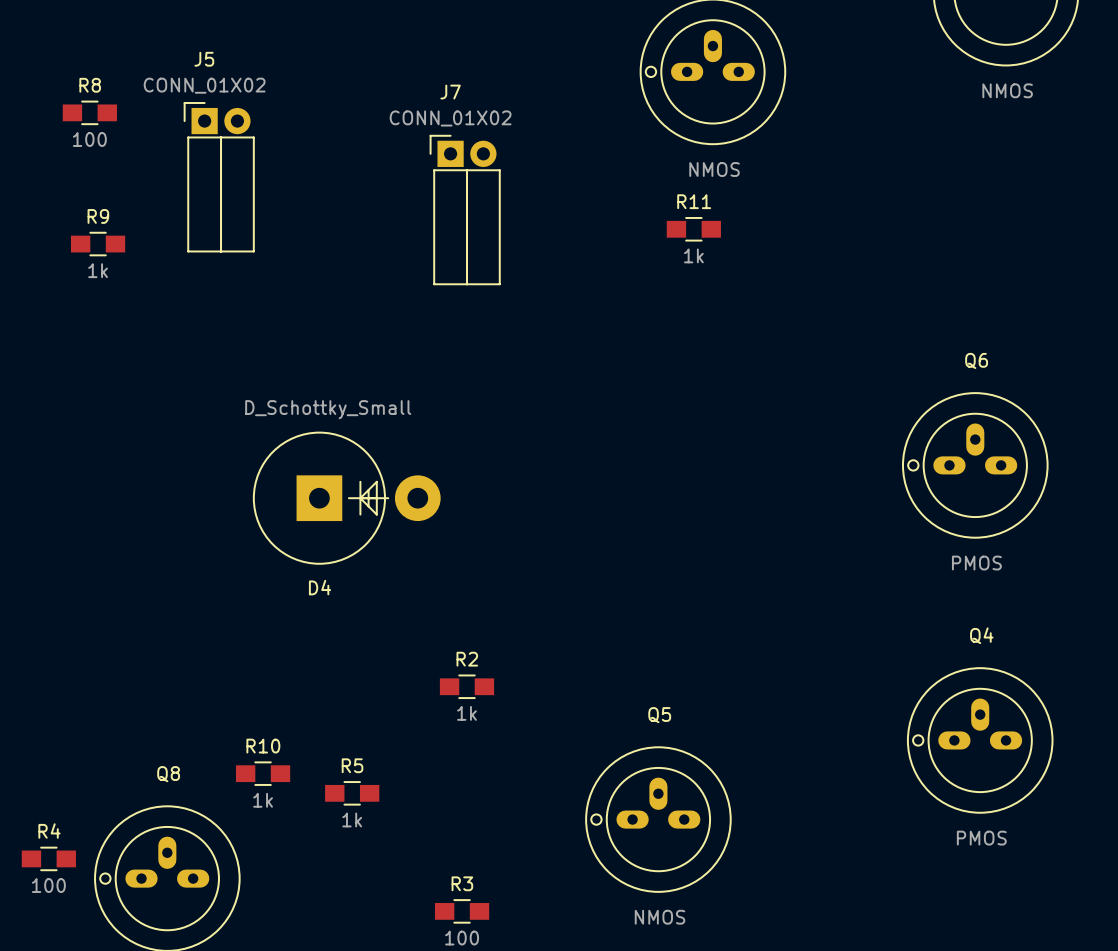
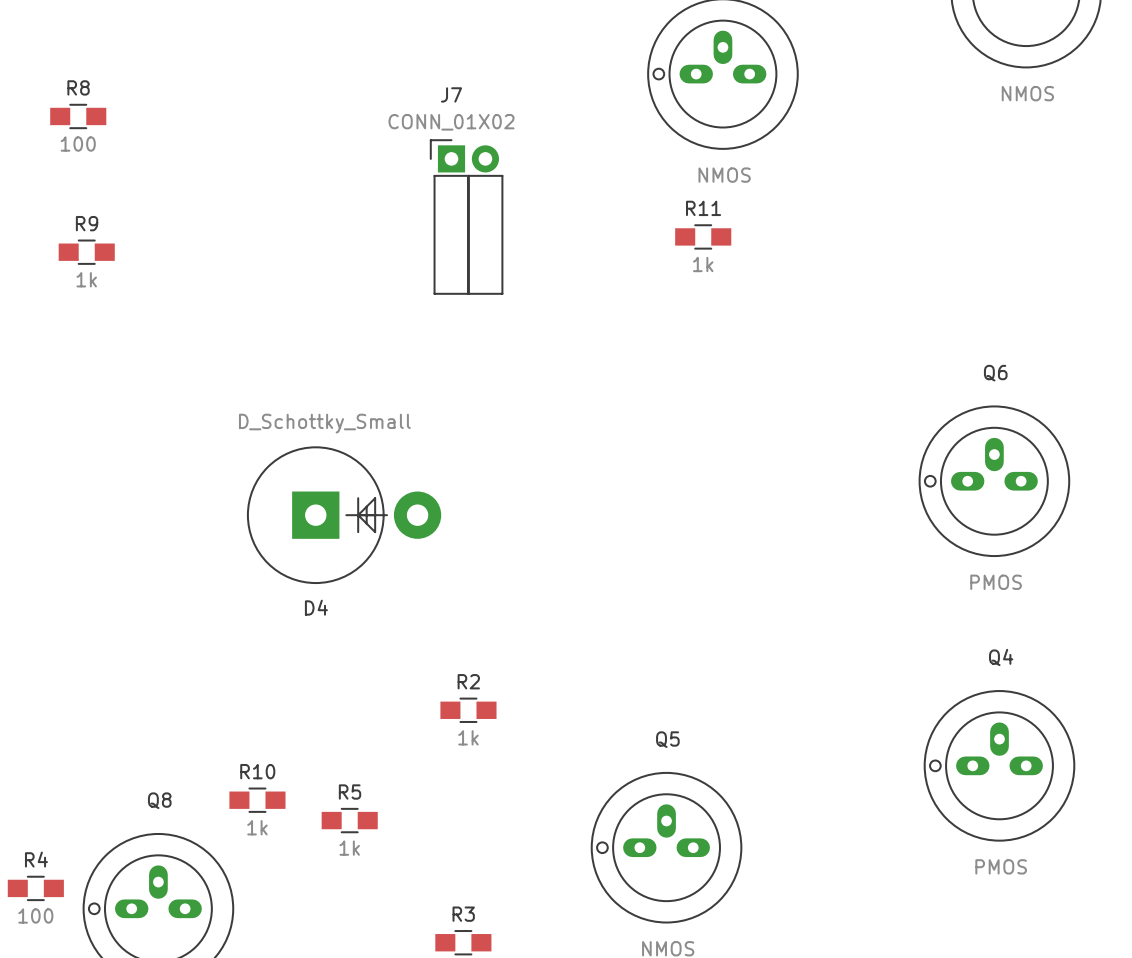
J5: CONN_01X02 (219, 177) -> none

